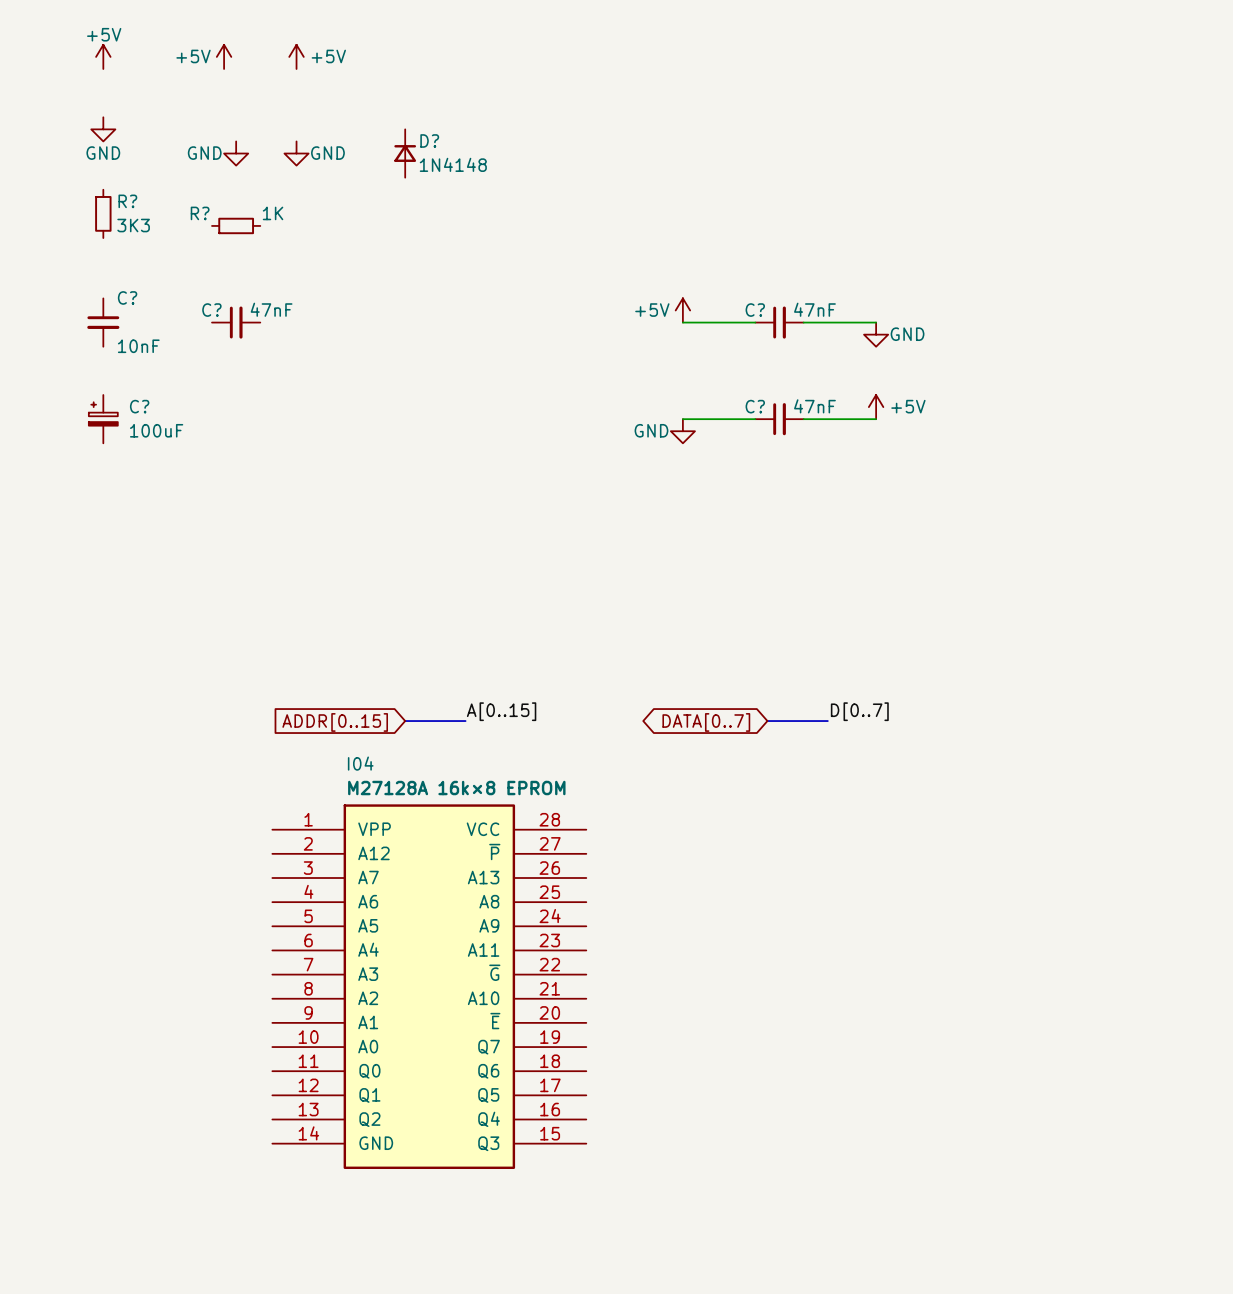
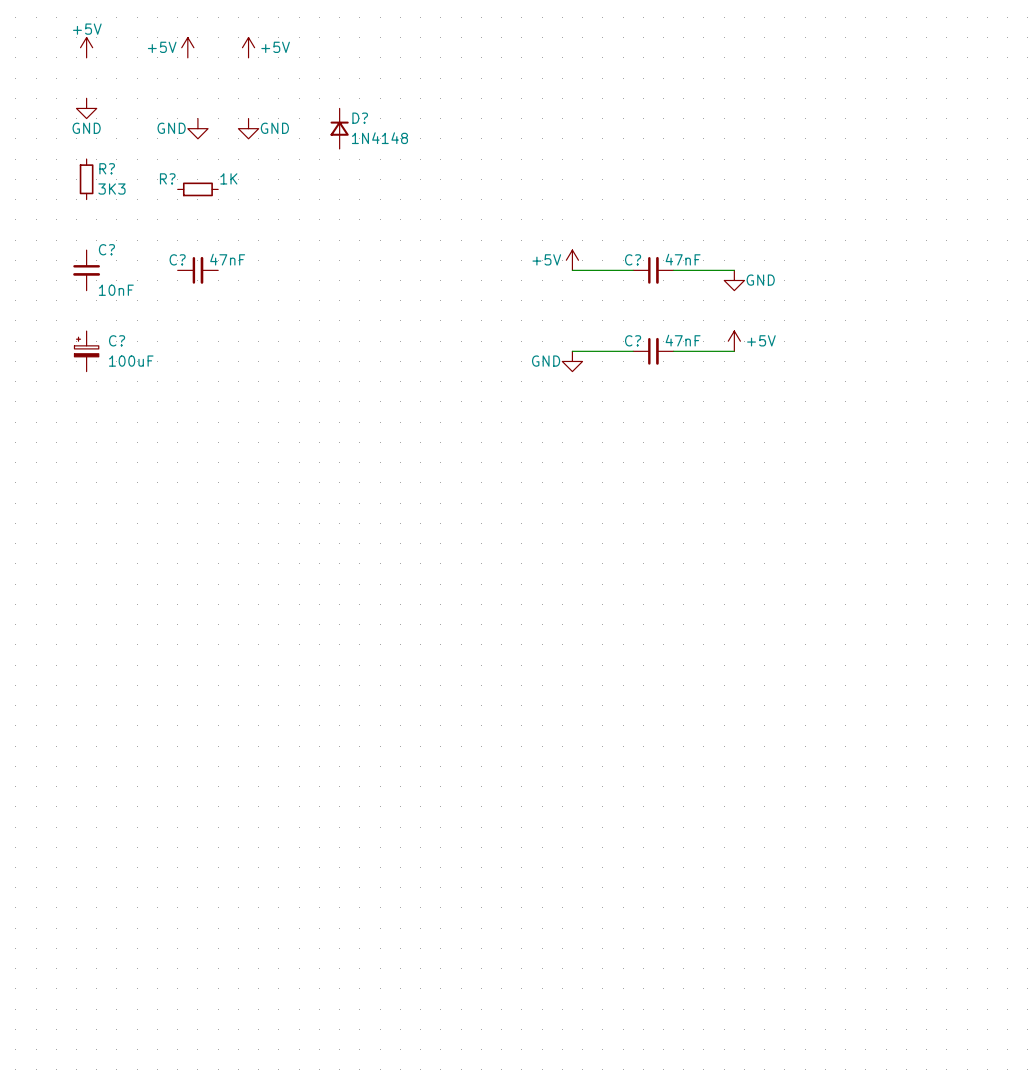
label: A[0..15] (501, 711) -> none
label: D[0..7] (859, 711) -> none
bus: (405, 721) (465, 721) -> none
bus: (767, 721) (827, 721) -> none
global label: ADDR[0..15] (335, 722) -> none
global label: DATA[0..7] (706, 722) -> none
I04: M27128A 16k×8 EPROM (429, 986) -> none

